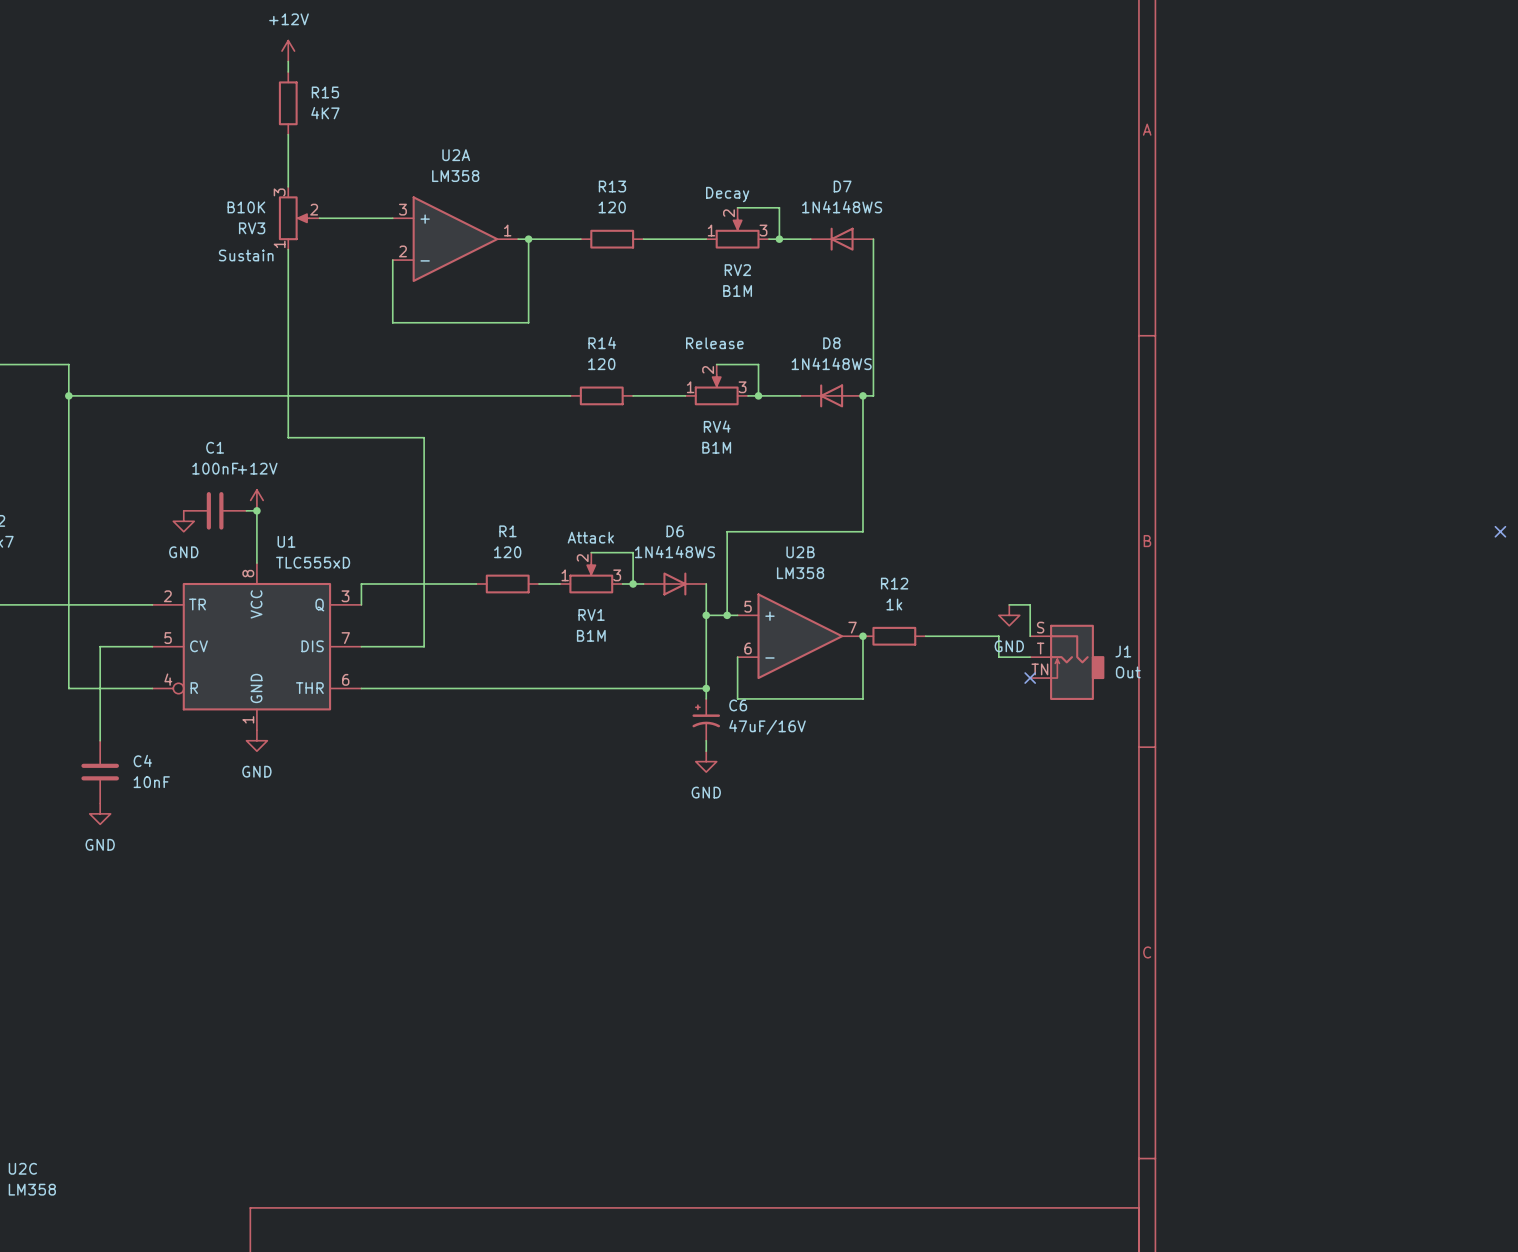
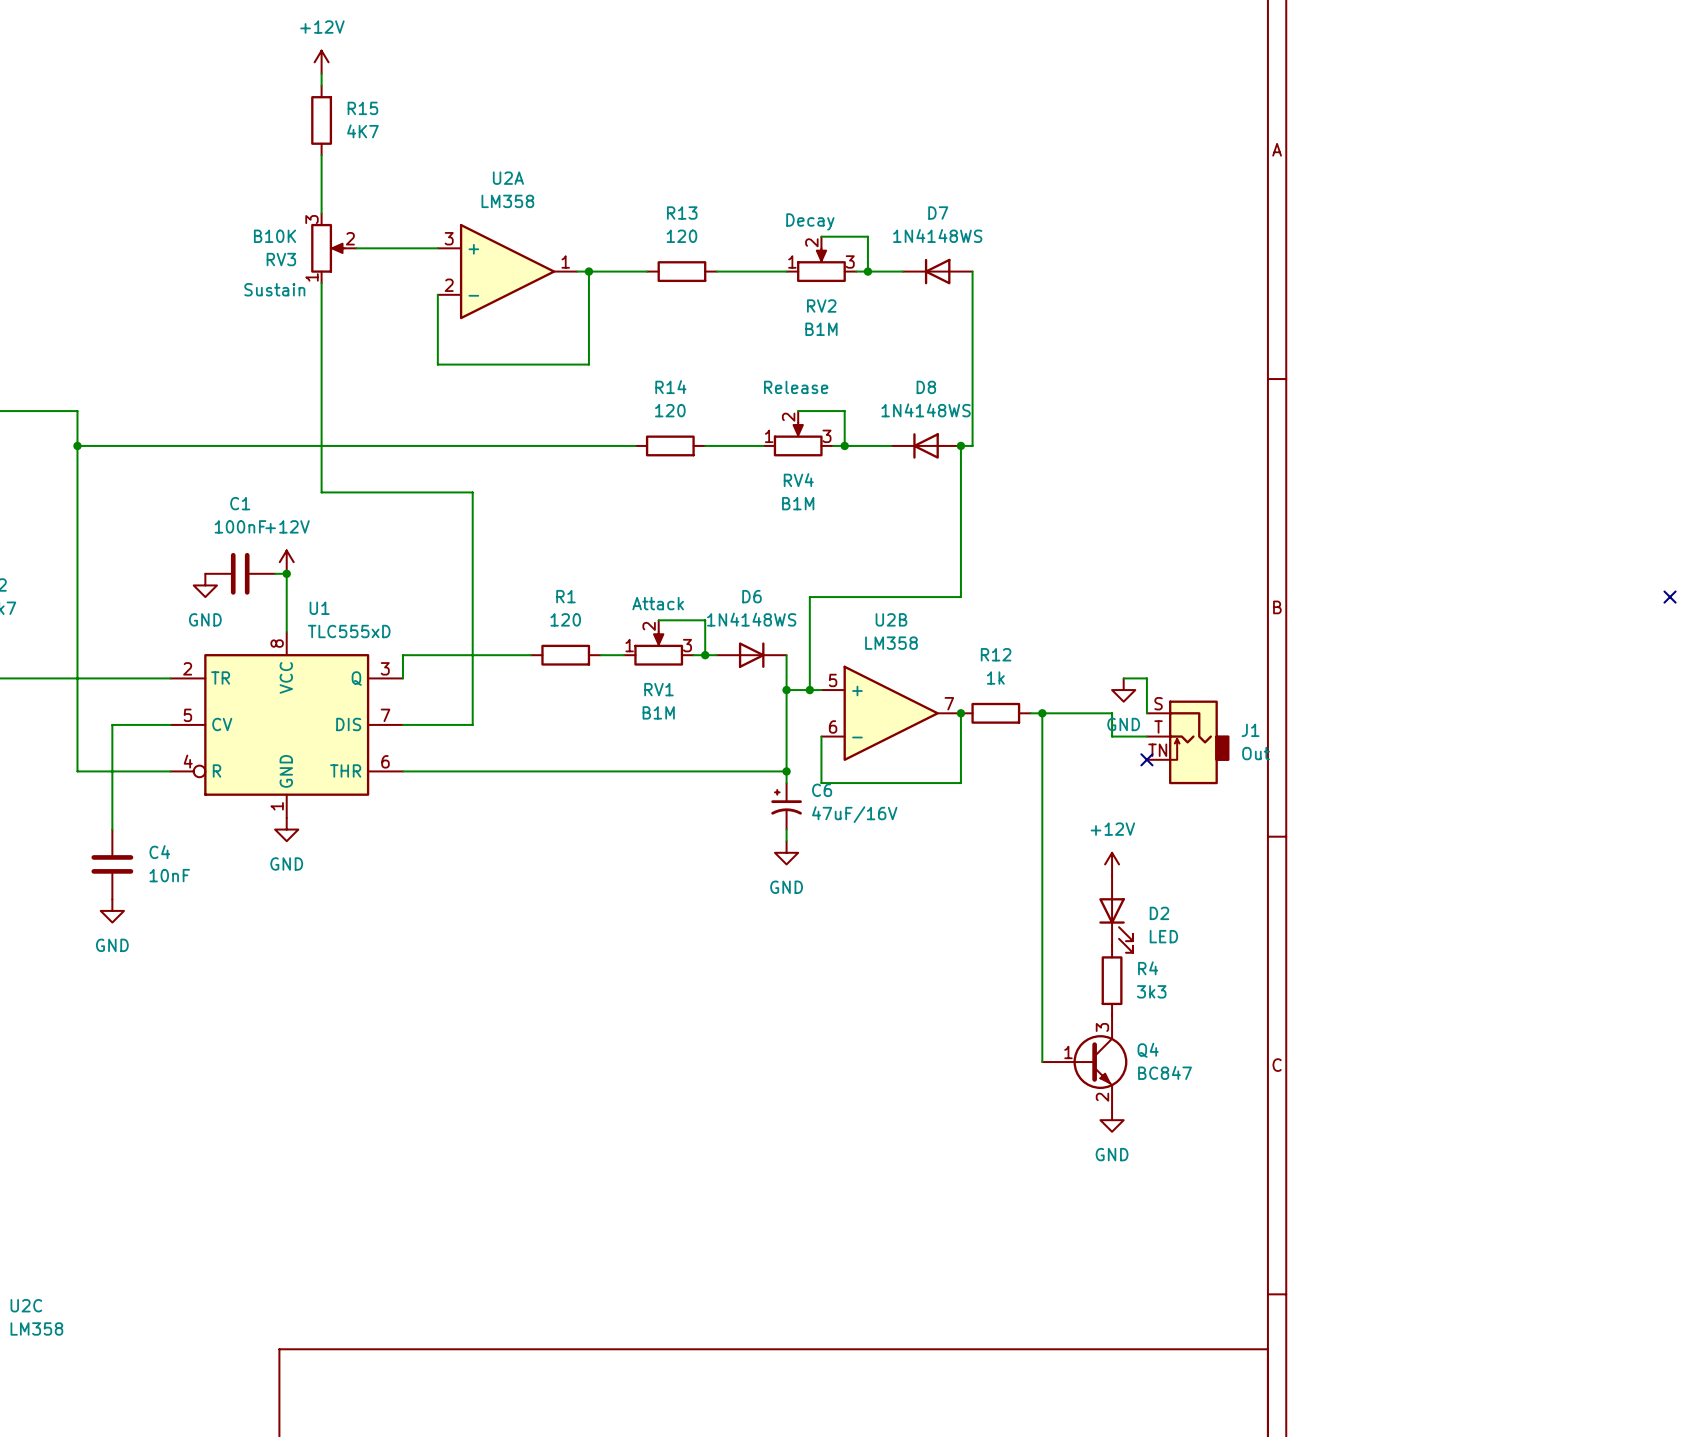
wire: none -> (1042, 713) (1042, 1062)
junction: none -> (1042, 713)
power symbol: none -> +12V (1112, 864)
D2: none -> LED (1116, 914)
R4: none -> 3k3 (1112, 980)
Q4: none -> BC847 (1084, 1062)
power symbol: none -> GND (1112, 1120)

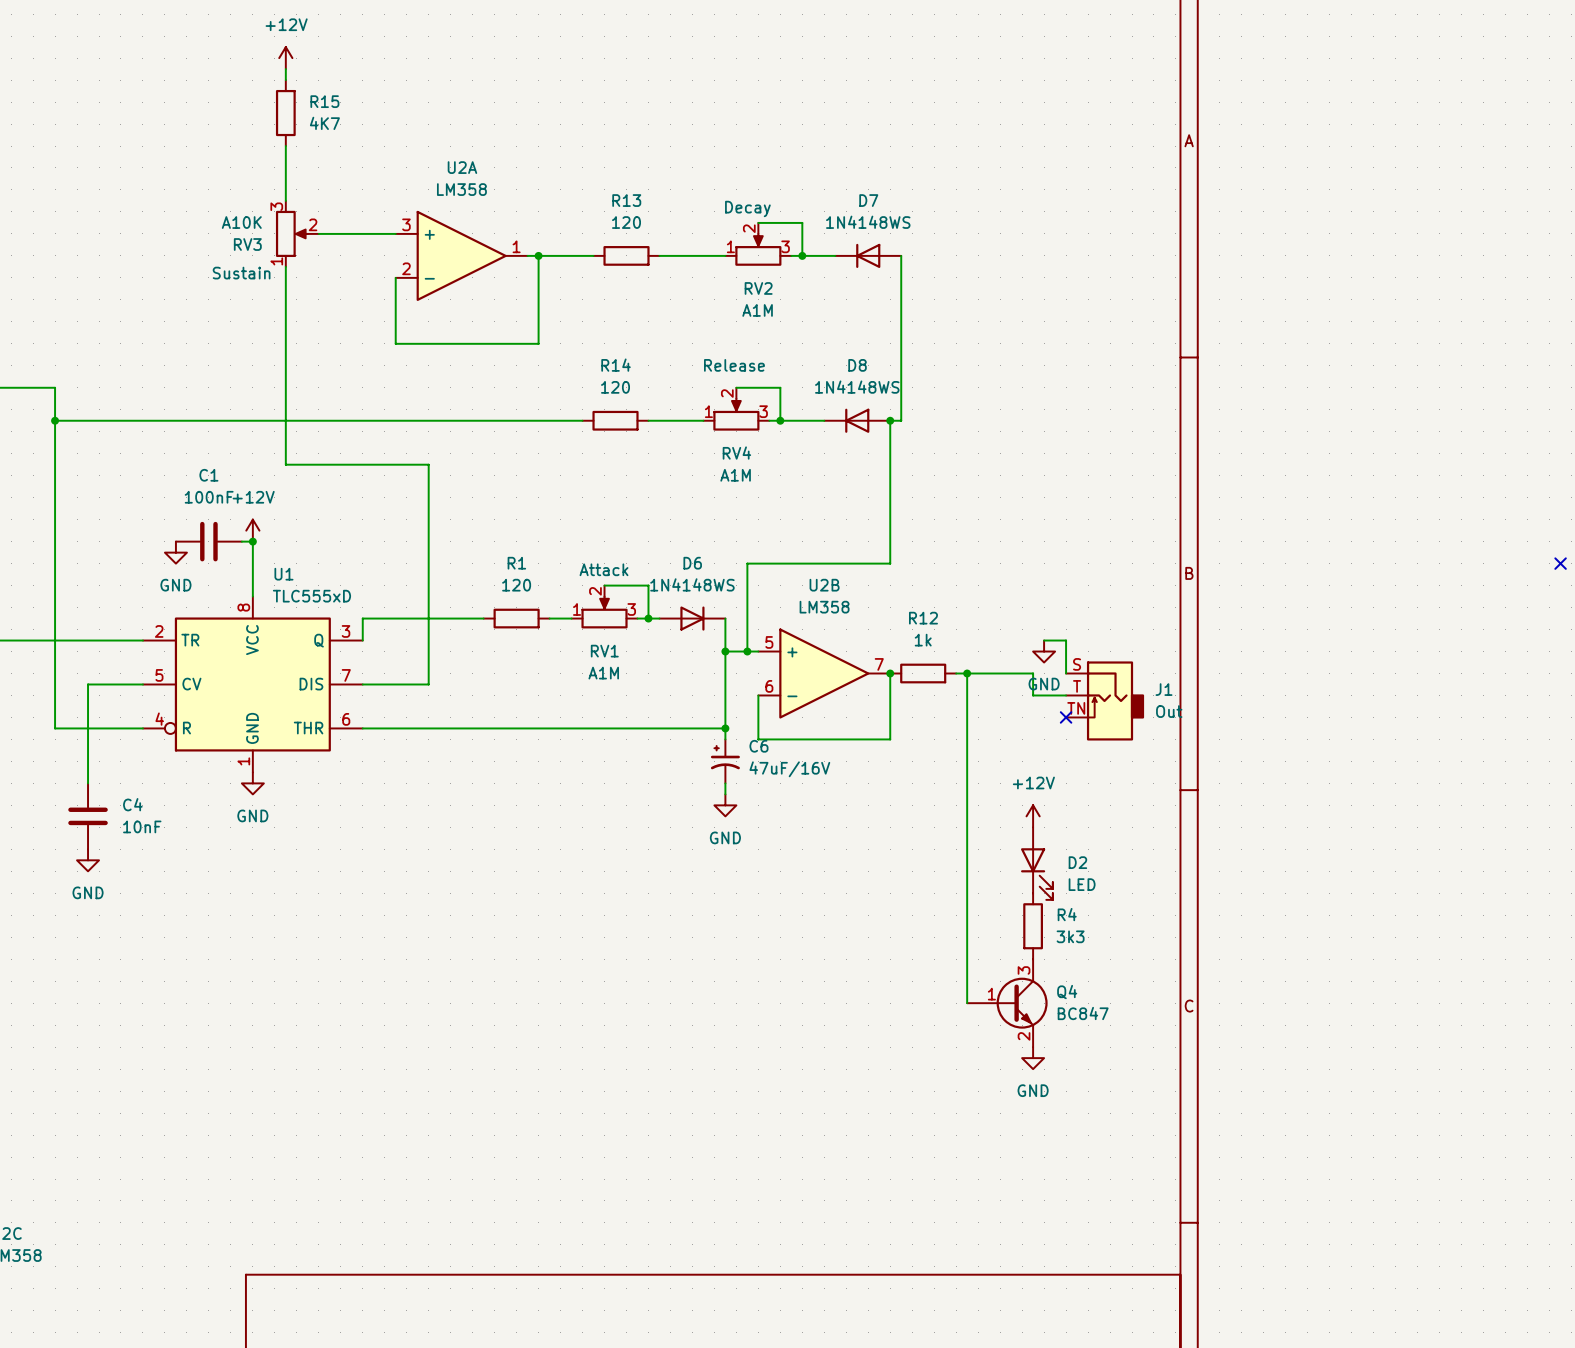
RV3 value: B10K (275, 236) -> A10K (241, 222)
RV2 value: B1M (821, 329) -> A1M (757, 310)
RV4 value: B1M (798, 503) -> A1M (735, 475)
RV1 value: B1M (658, 712) -> A1M (603, 673)

